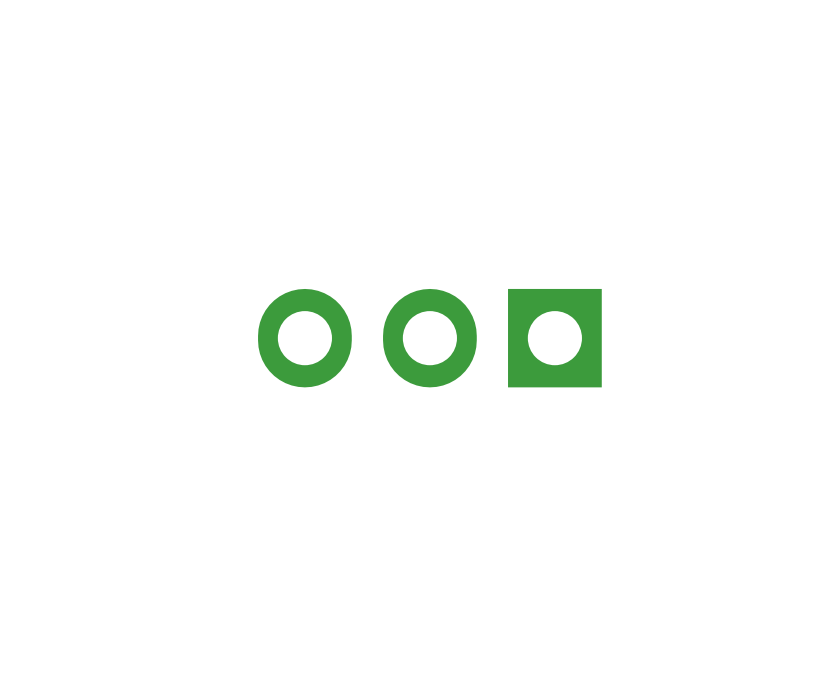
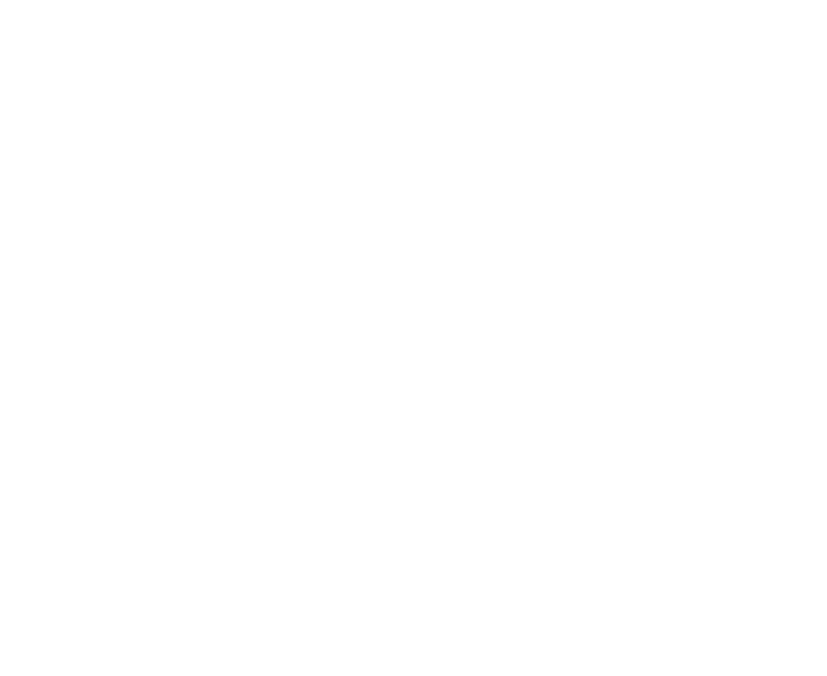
part: (429, 338) -> none

